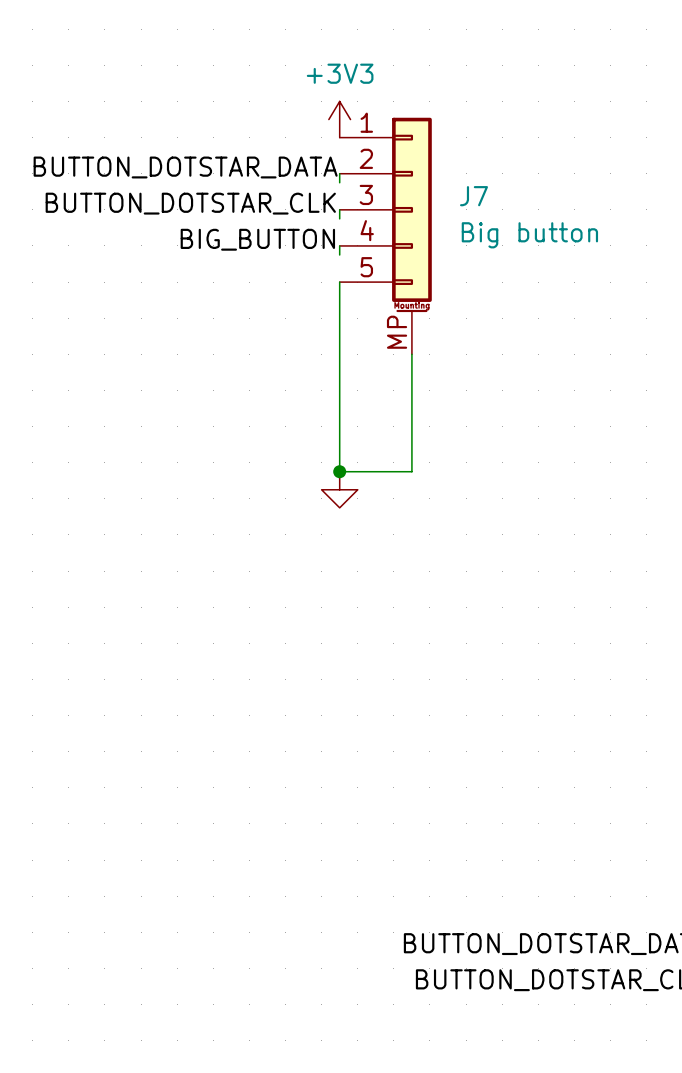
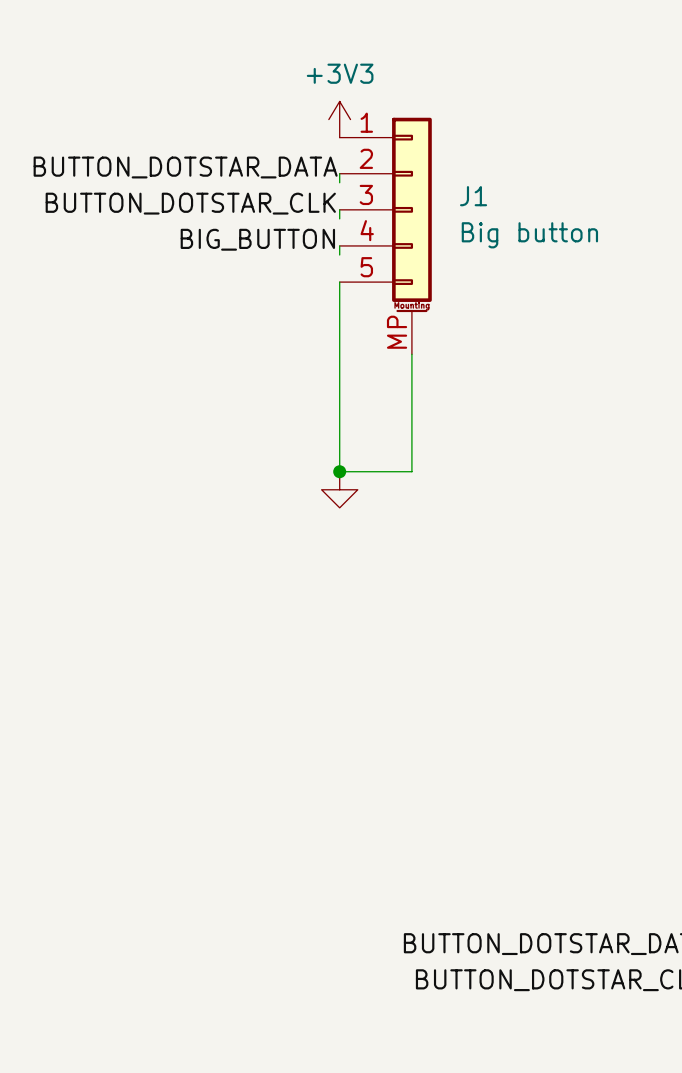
J7 name: J7 (473, 196) -> J1 (473, 196)

